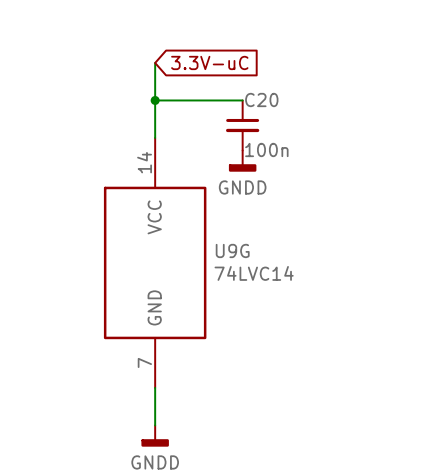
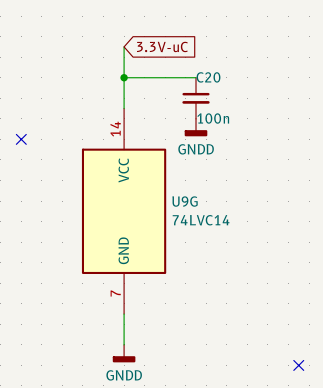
no-connect mark: none -> (21, 139)
no-connect mark: none -> (298, 365)

